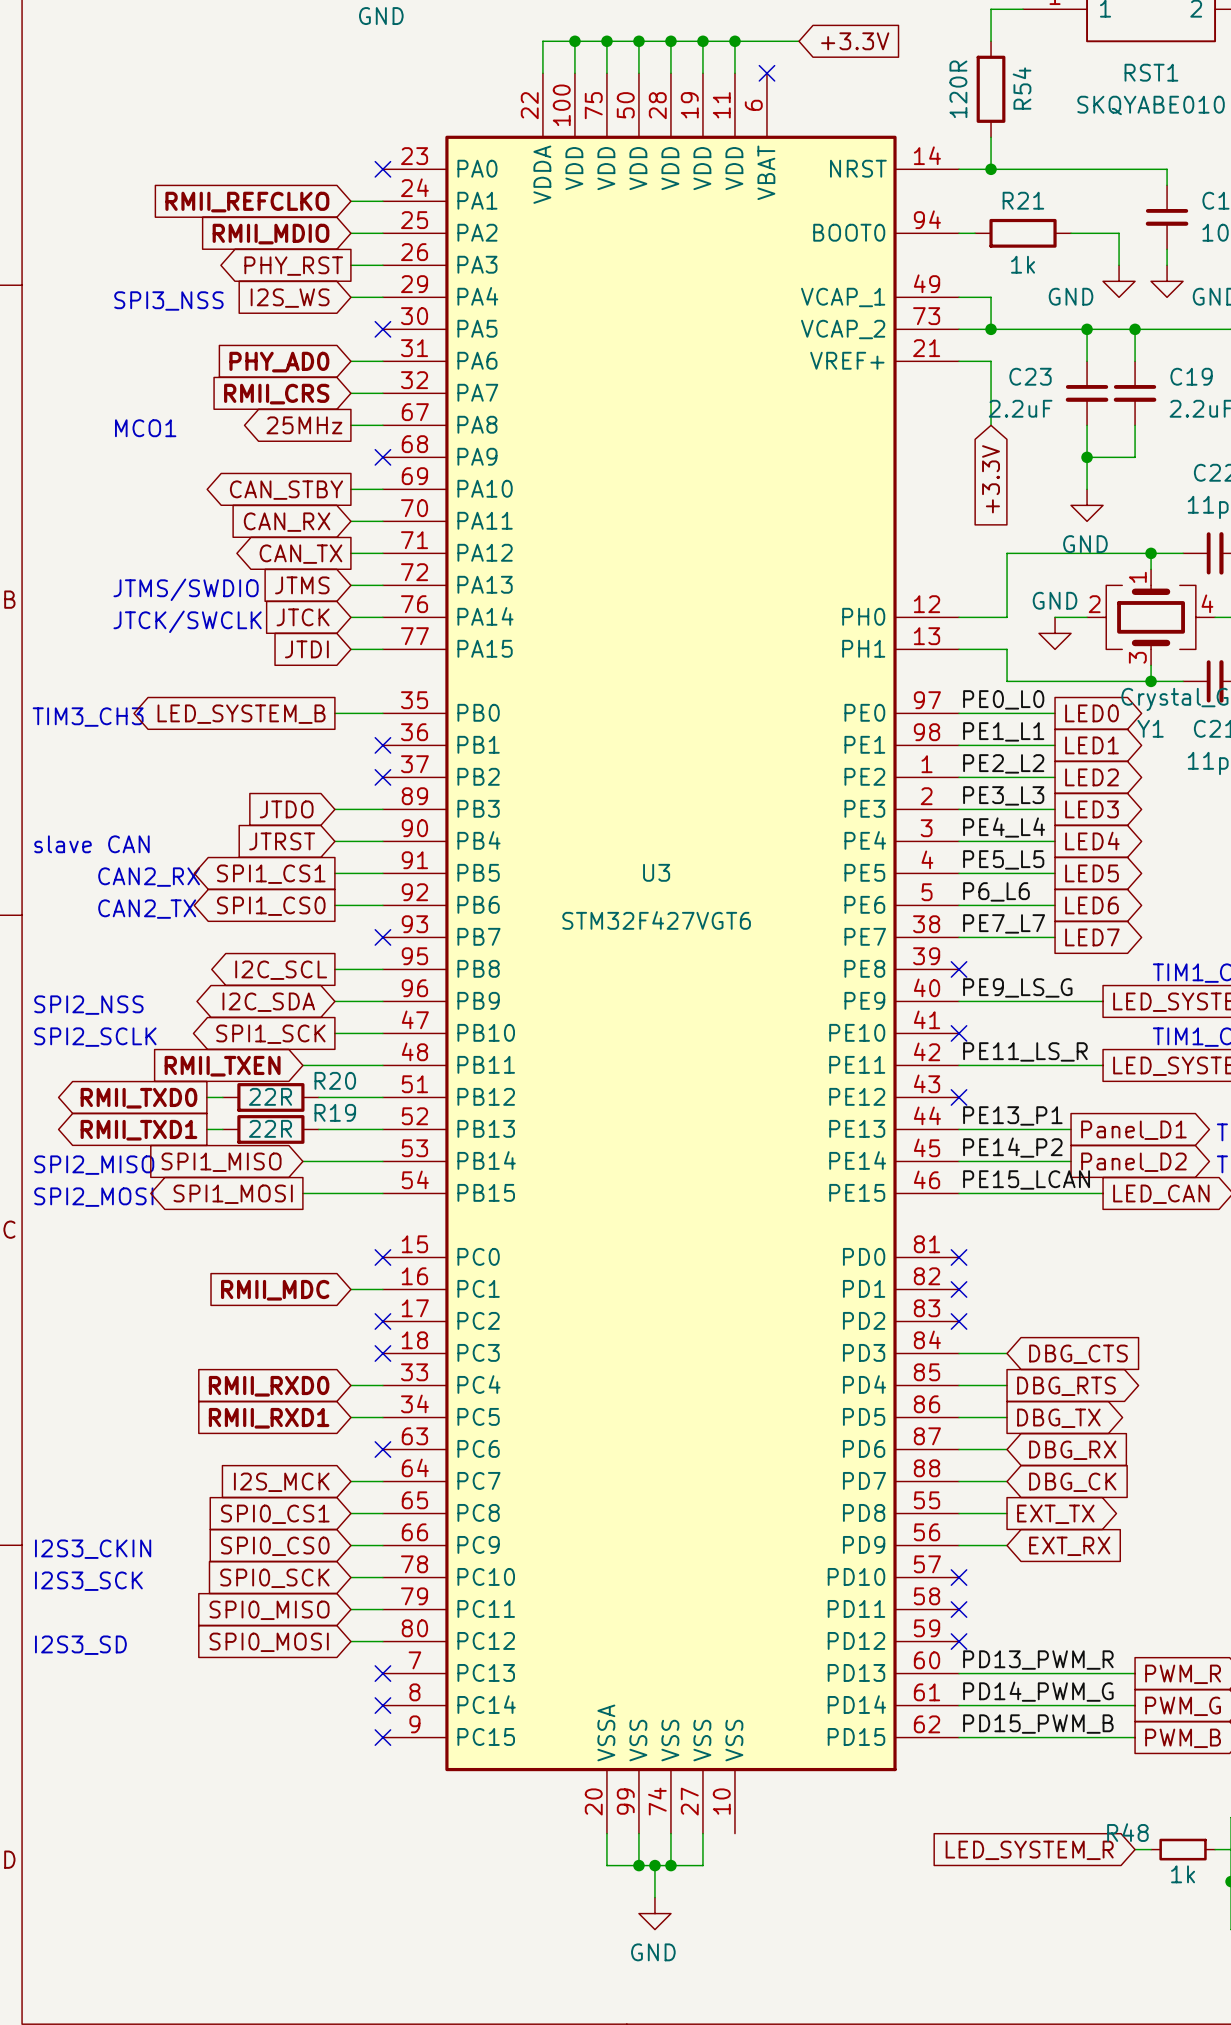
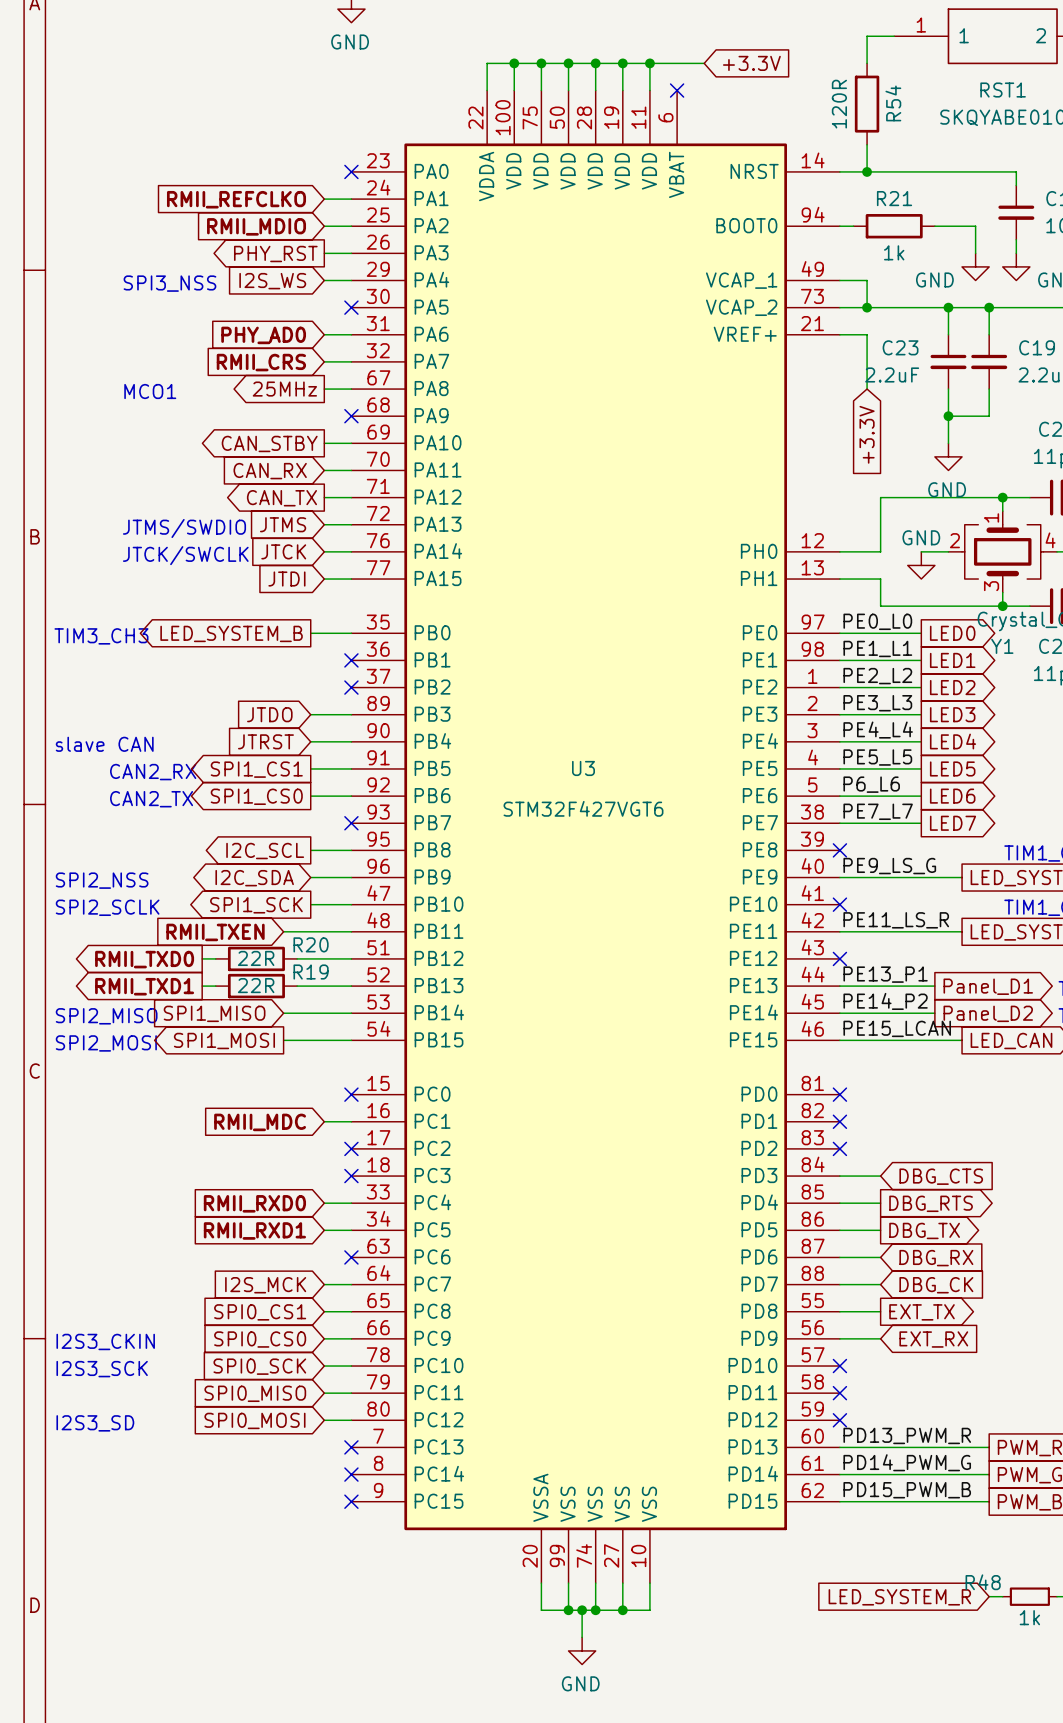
wire: none -> (649, 1583) (649, 1610) (622, 1610)
junction: none -> (622, 1610)

